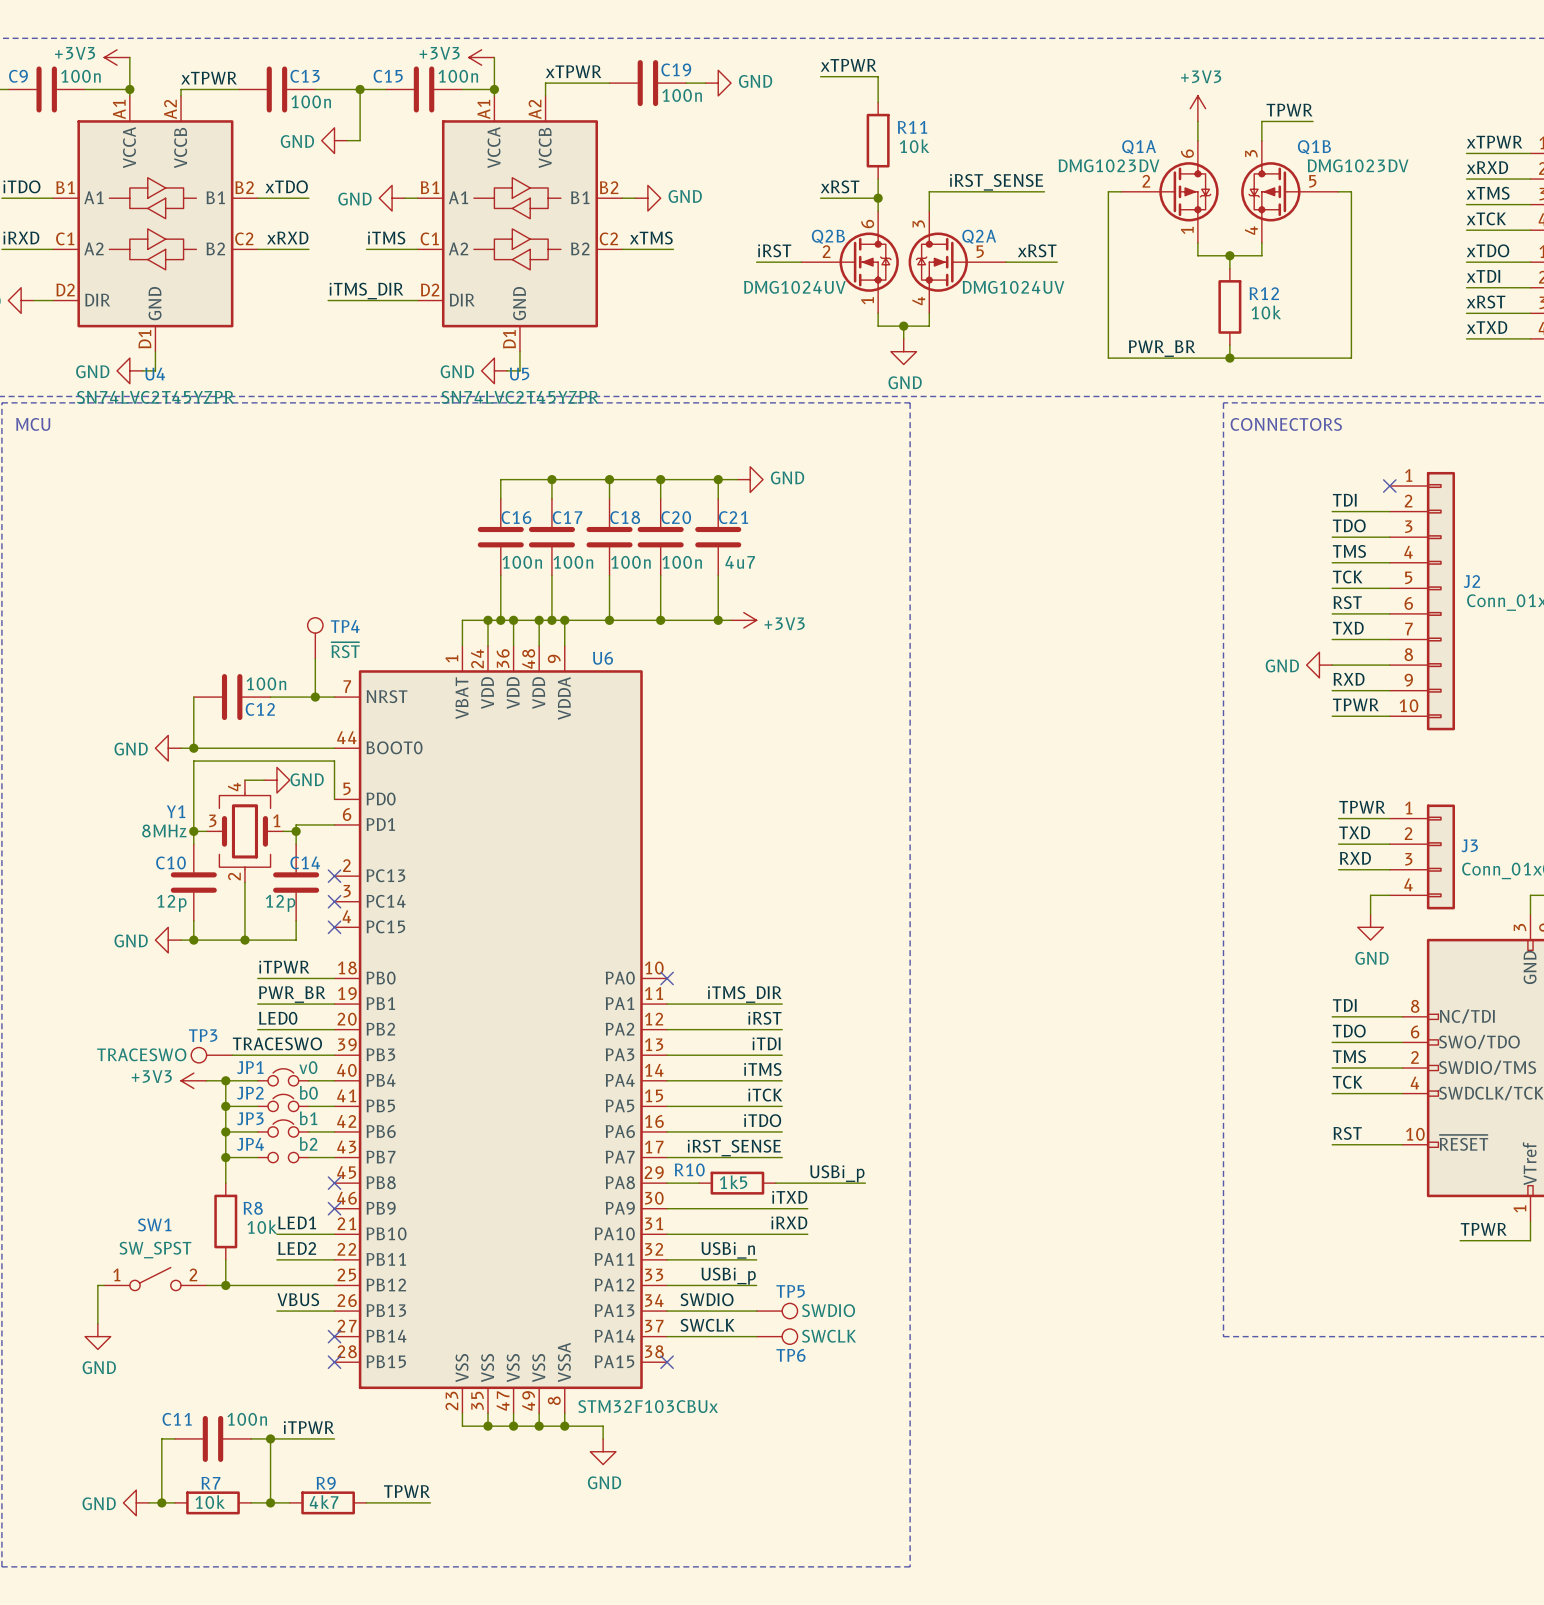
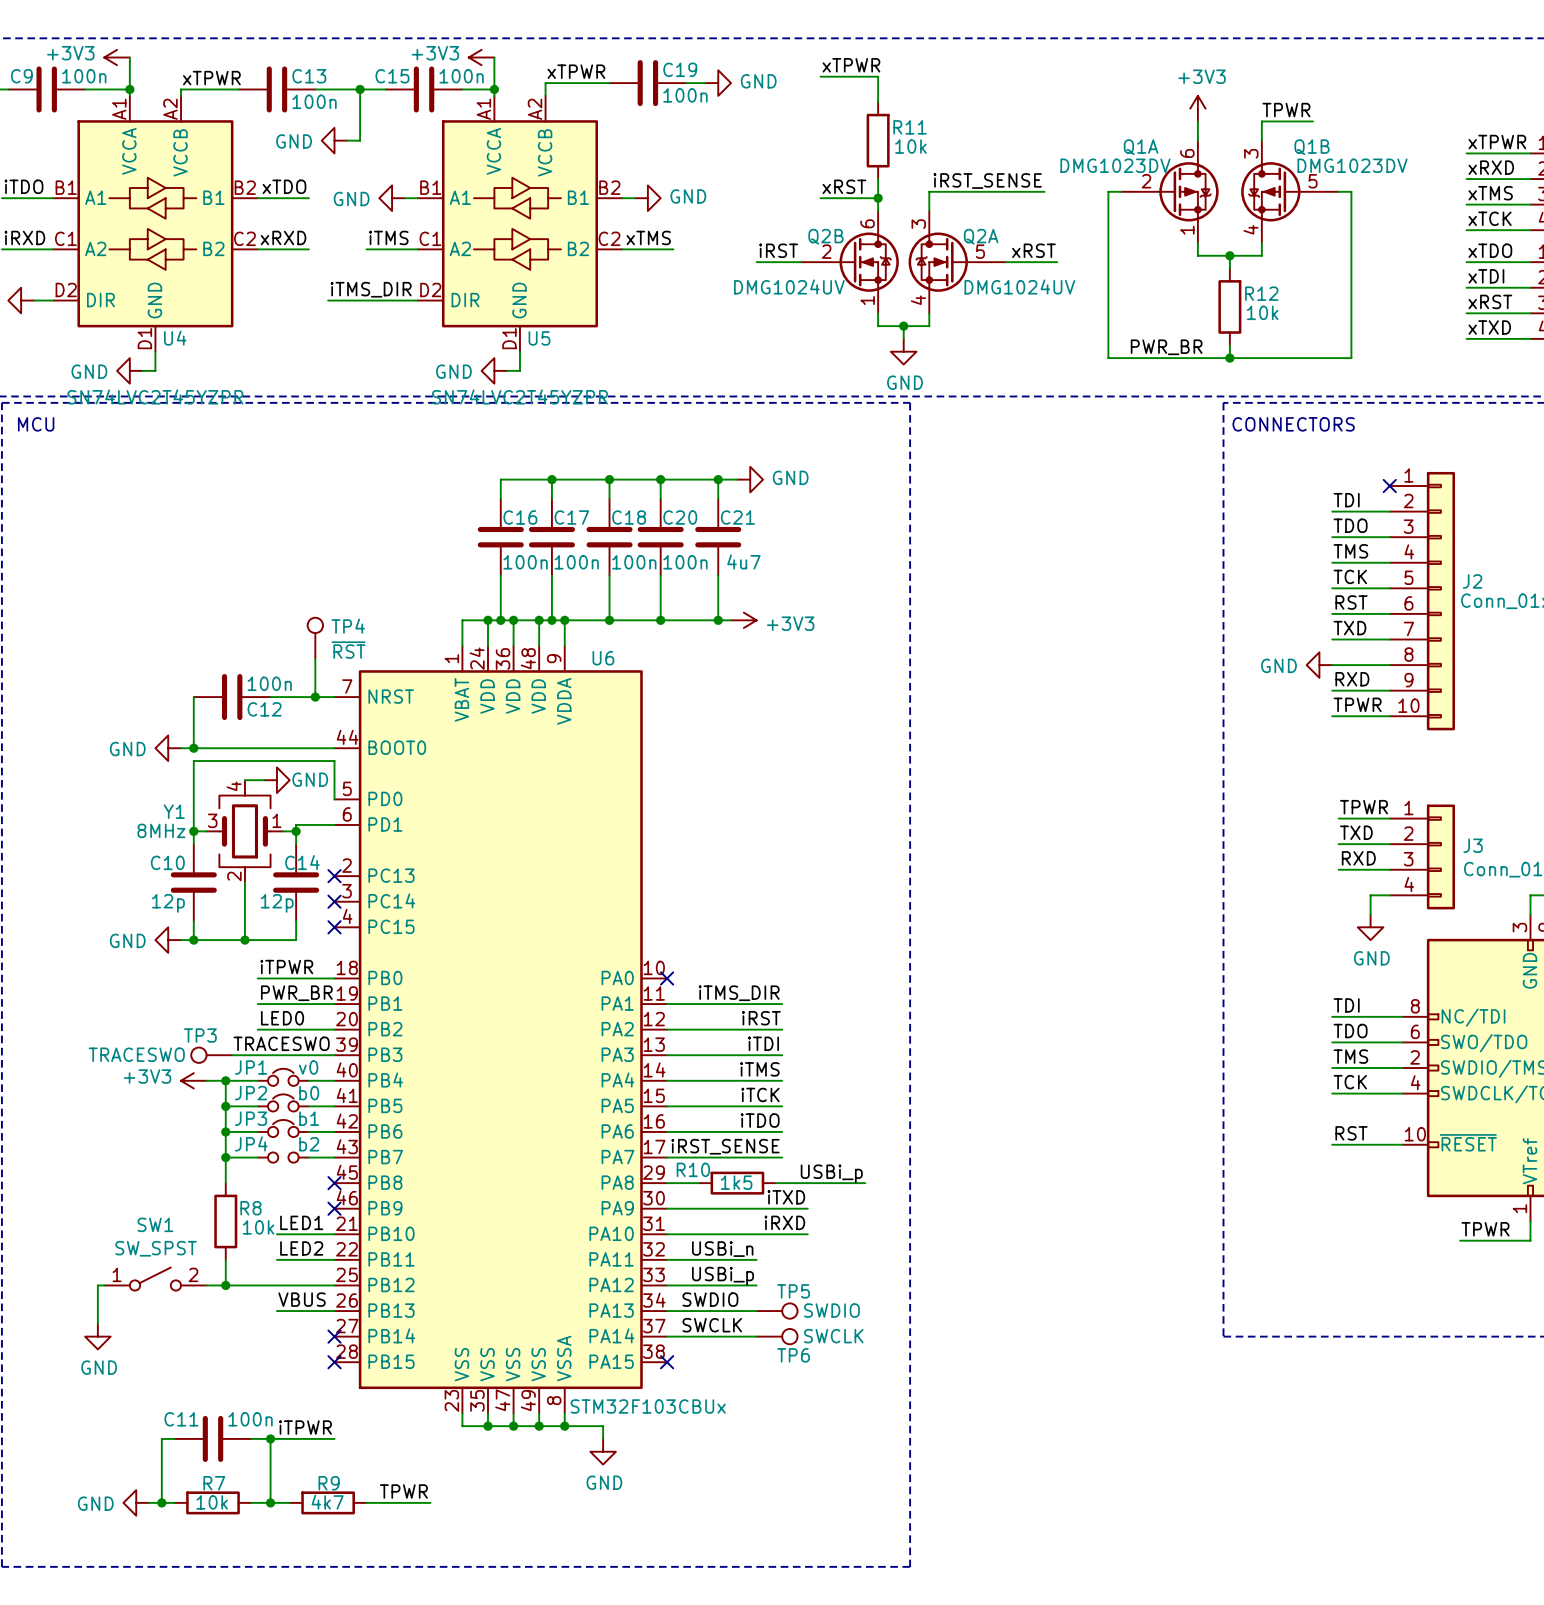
U4 name position: U4 (155, 374) -> U4 (175, 338)
U5 name position: U5 (519, 374) -> U5 (539, 338)

